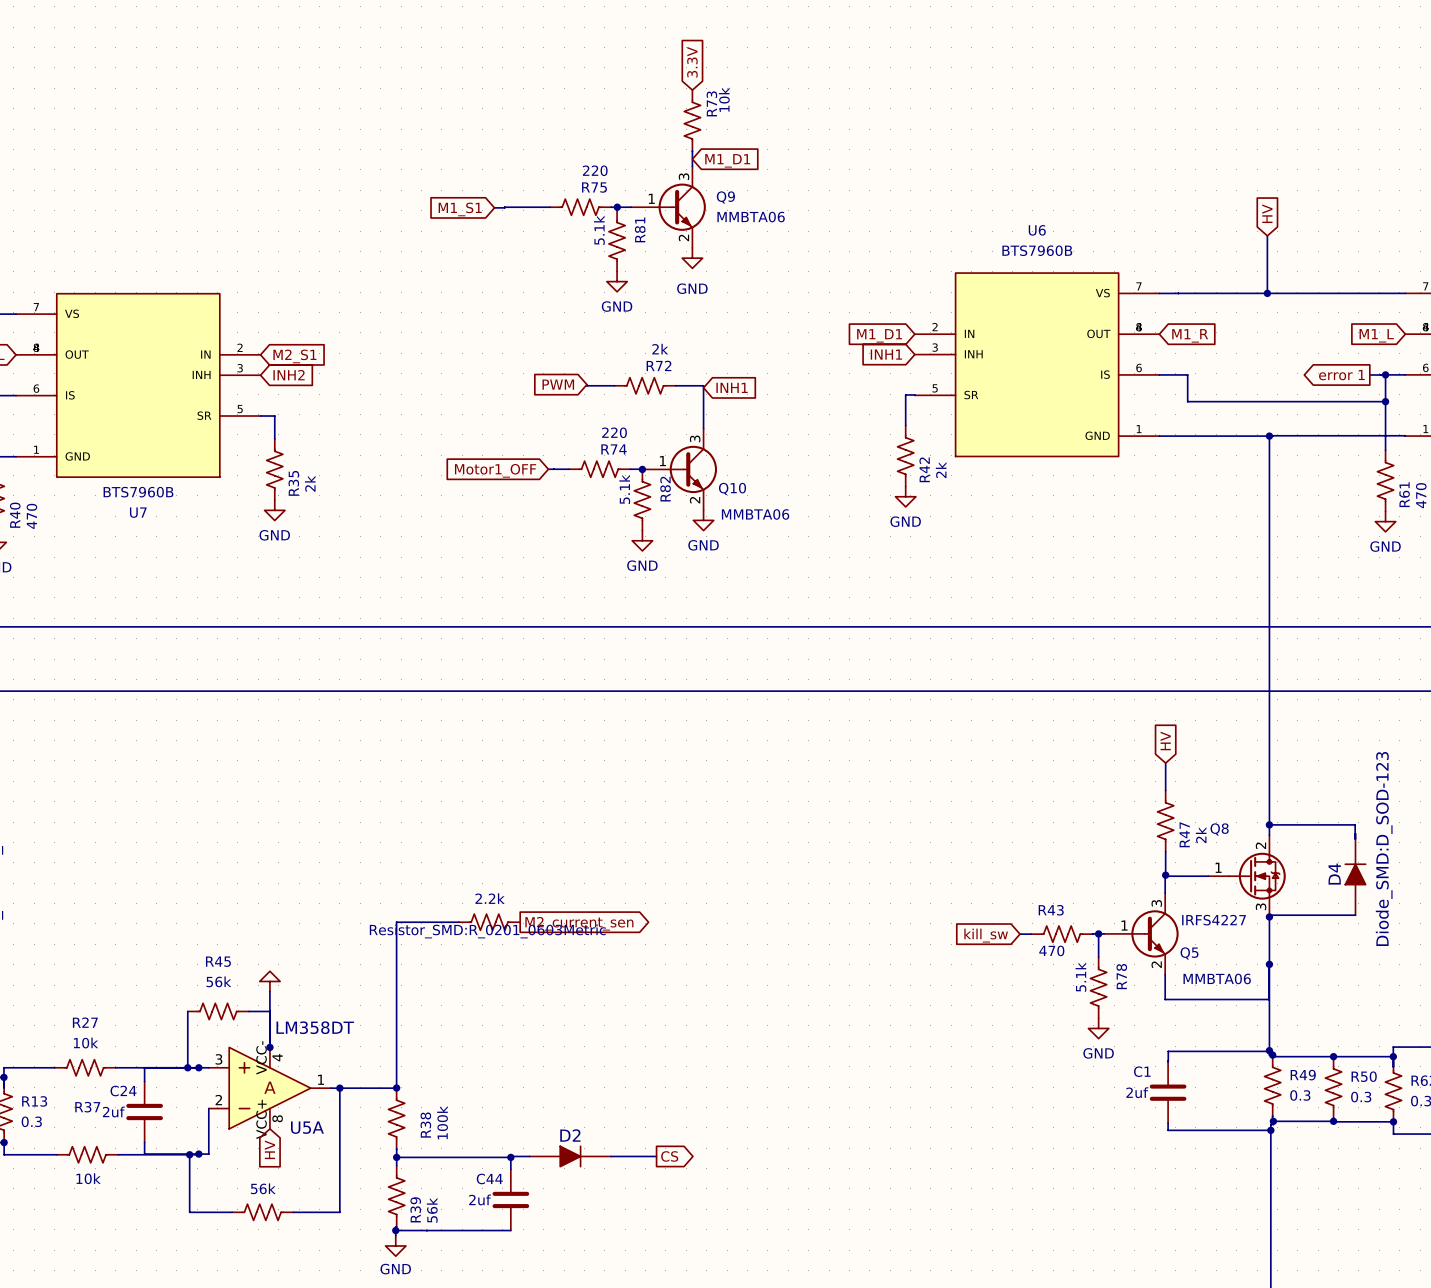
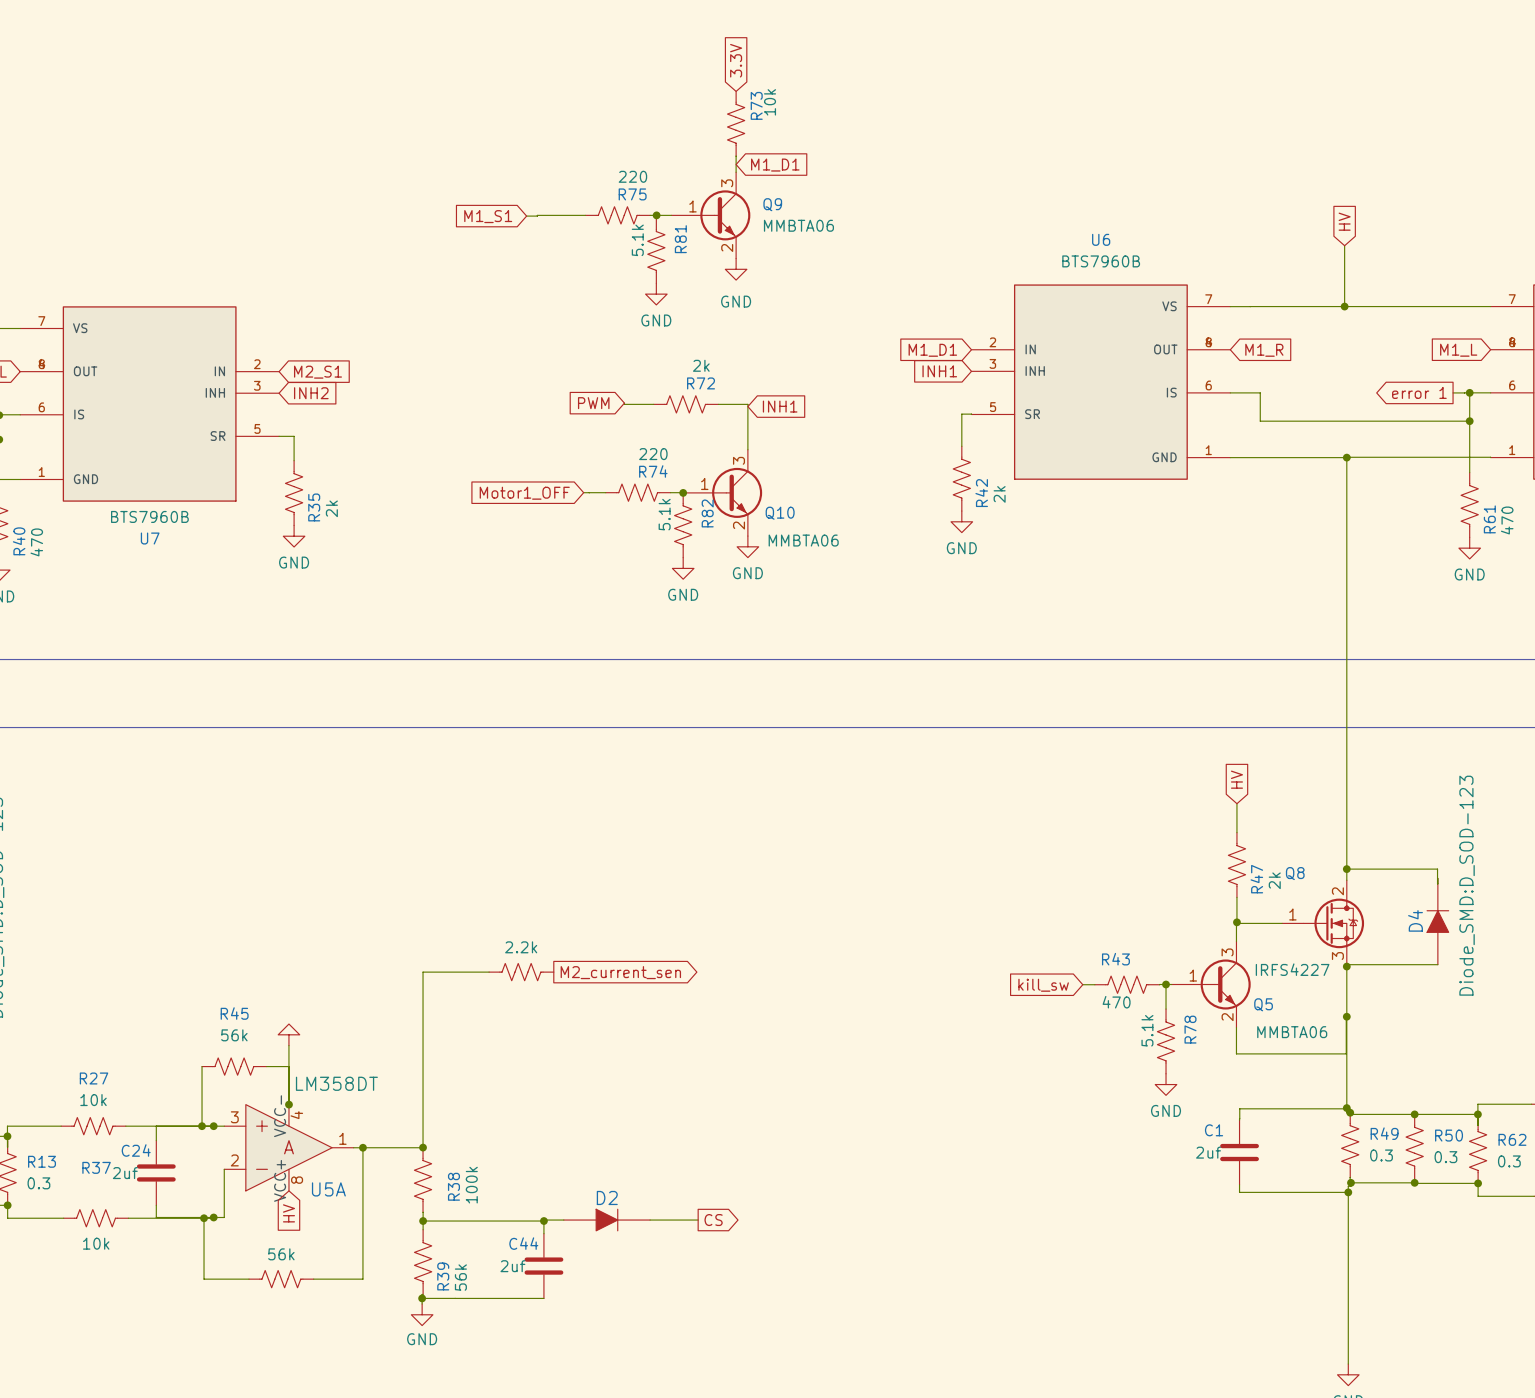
part text: Resistor_SMD:R_0201_0603Metric (487, 931) -> none

